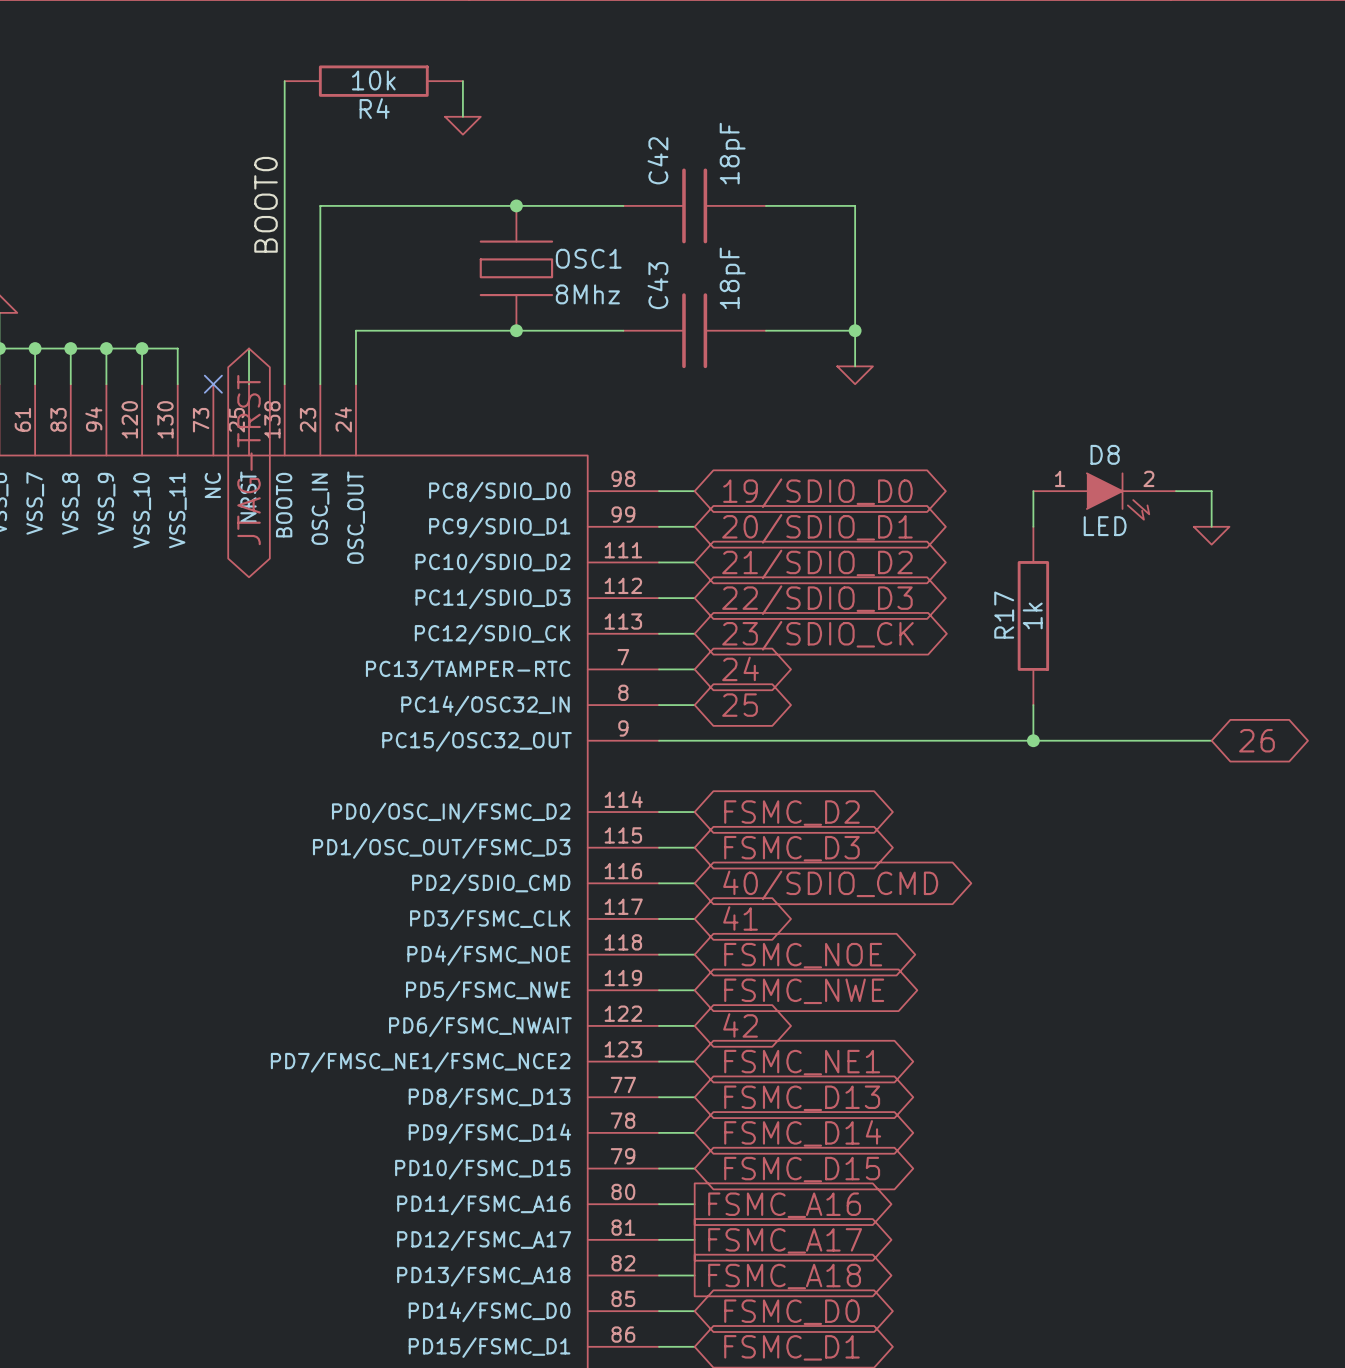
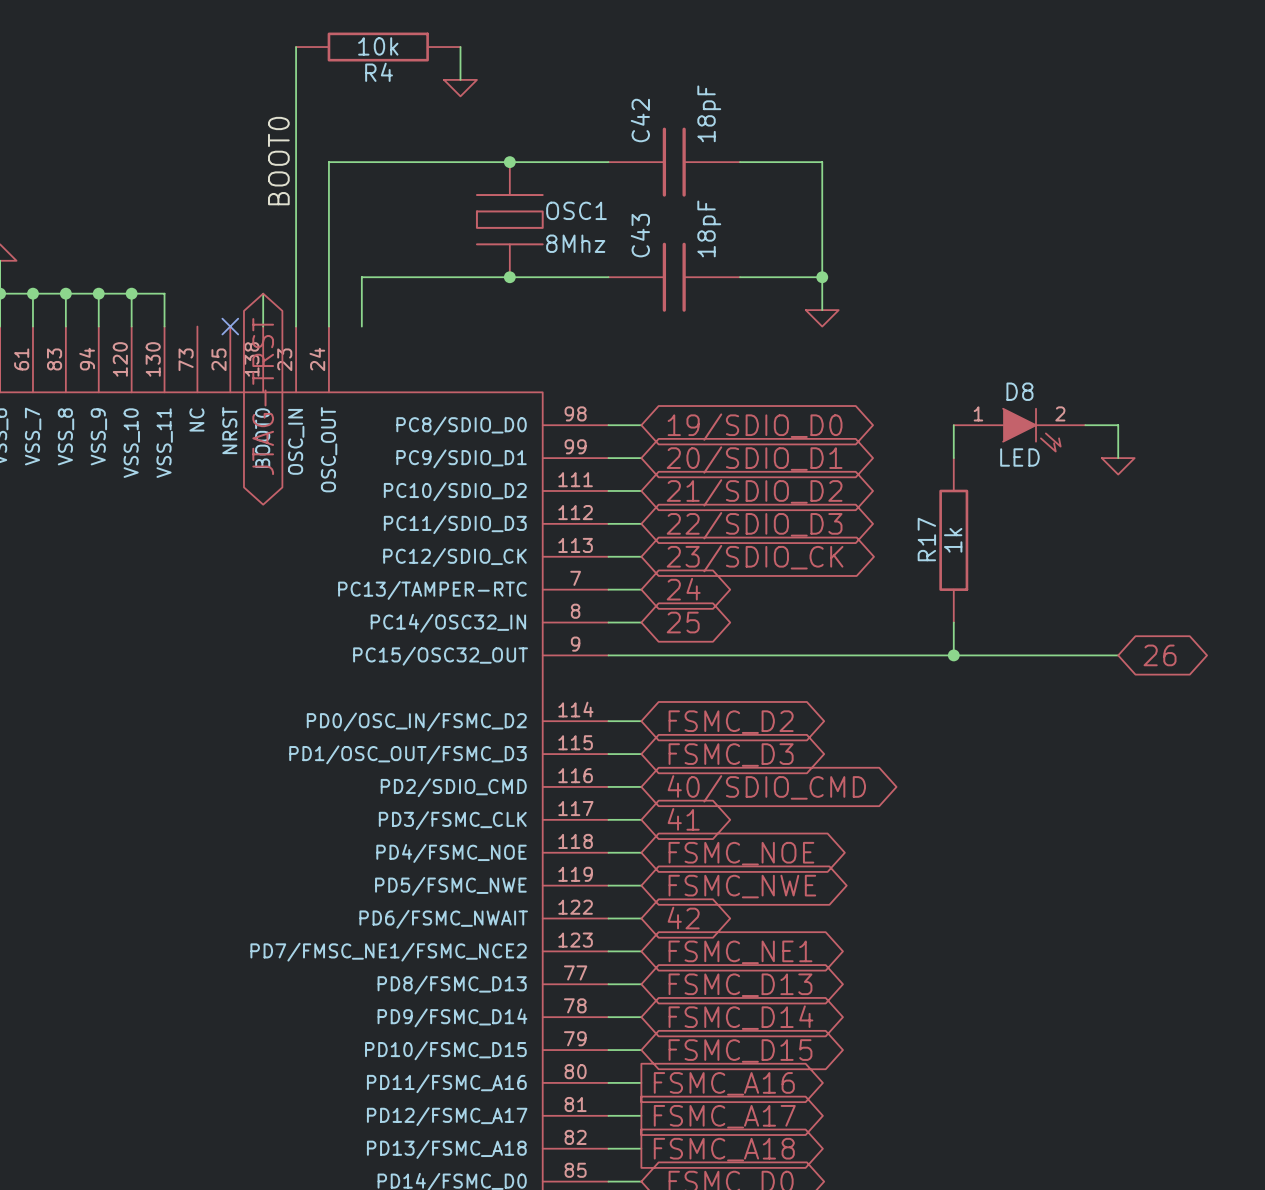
wire: (284, 81) (284, 348) -> none
R4 position: (373, 81) -> (378, 47)
wire: (462, 81) (462, 116) -> (460, 47) (460, 79)
power symbol position: (462, 125) -> (460, 88)
label position: BOOT0 (266, 204) -> BOOT0 (278, 161)
wire: (320, 205) (355, 205) -> (296, 162) (296, 47)
wire: none -> (328, 162) (328, 277)
junction position: (516, 205) -> (509, 162)
C42 position: (694, 205) -> (674, 162)
wire: (855, 205) (855, 366) -> (789, 162) (822, 162) (822, 310)
OSC1 position: (542, 268) -> (534, 219)
wire: (355, 330) (391, 330) -> (361, 326) (361, 277)
junction position: (516, 330) -> (509, 277)
C43 position: (694, 330) -> (674, 277)
wire: none -> (789, 277) (822, 277)
junction position: (855, 330) -> (822, 277)
wire: (249, 348) (249, 384) -> none
power symbol position: (855, 375) -> (822, 318)
no-connect mark position: (213, 384) -> (230, 326)
global label position: JTAG-TRST (249, 460) -> JTAG-TRST (263, 396)

